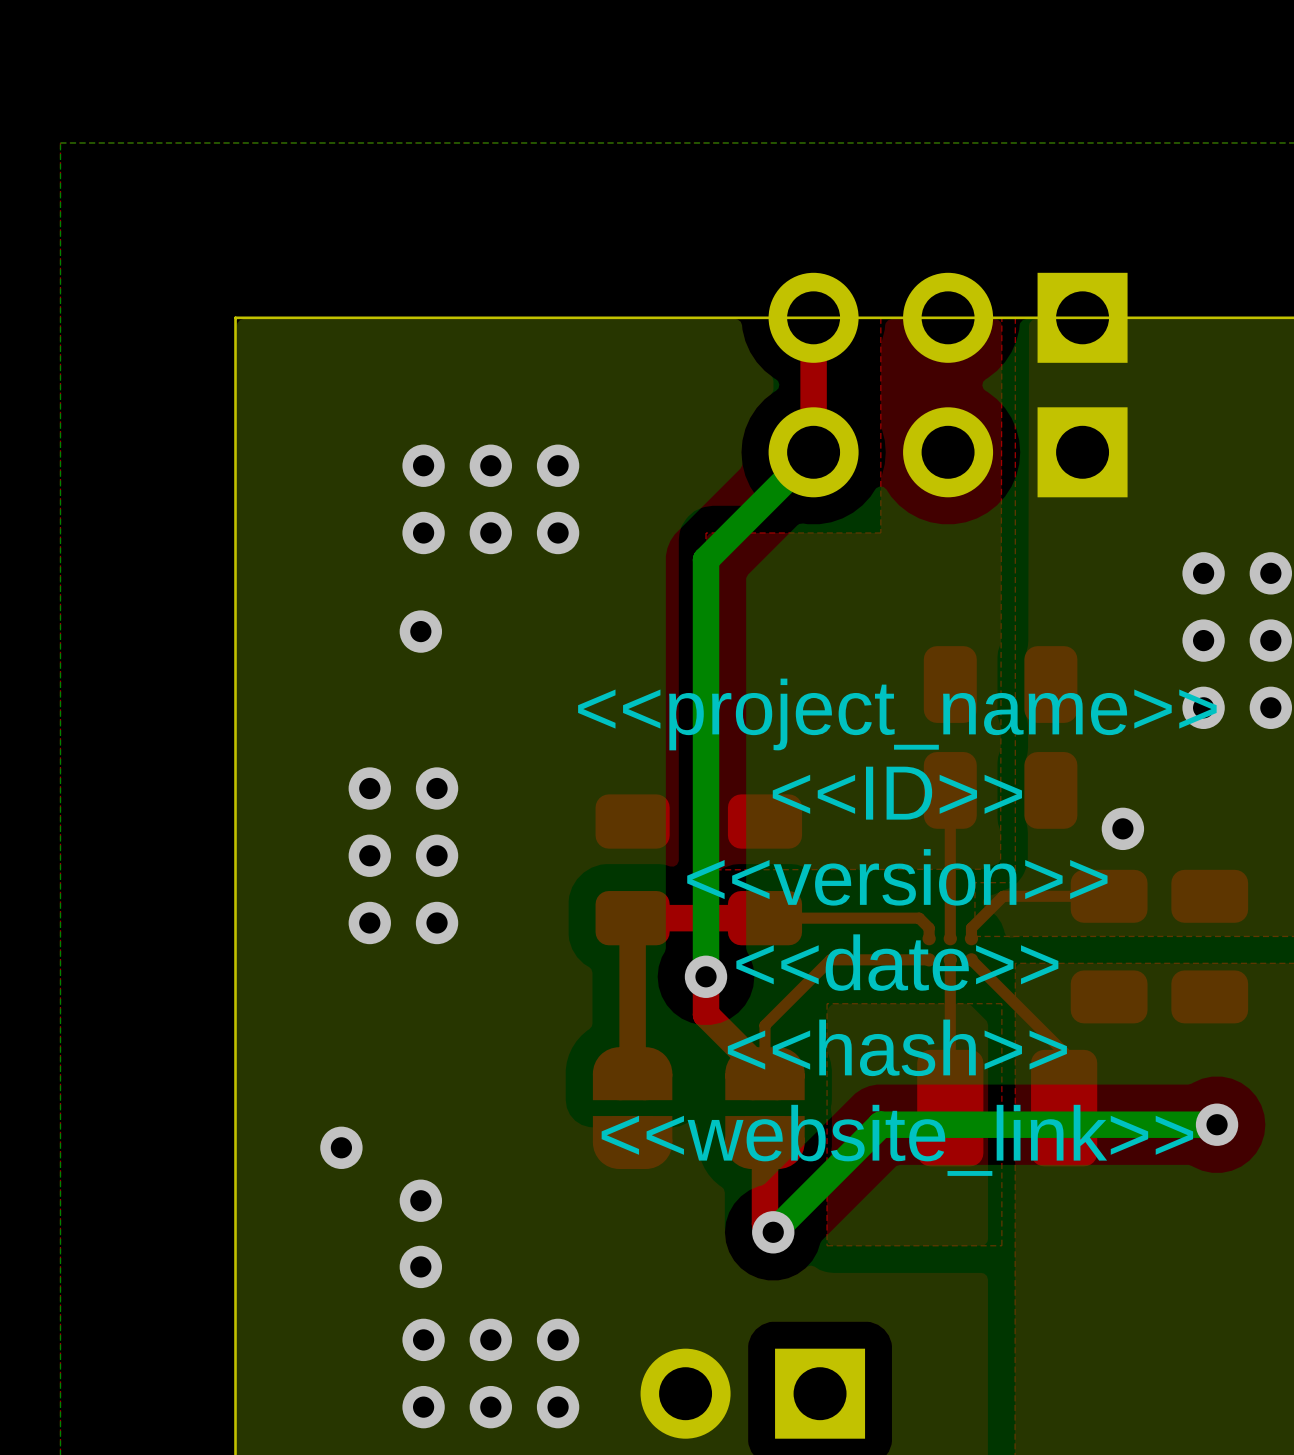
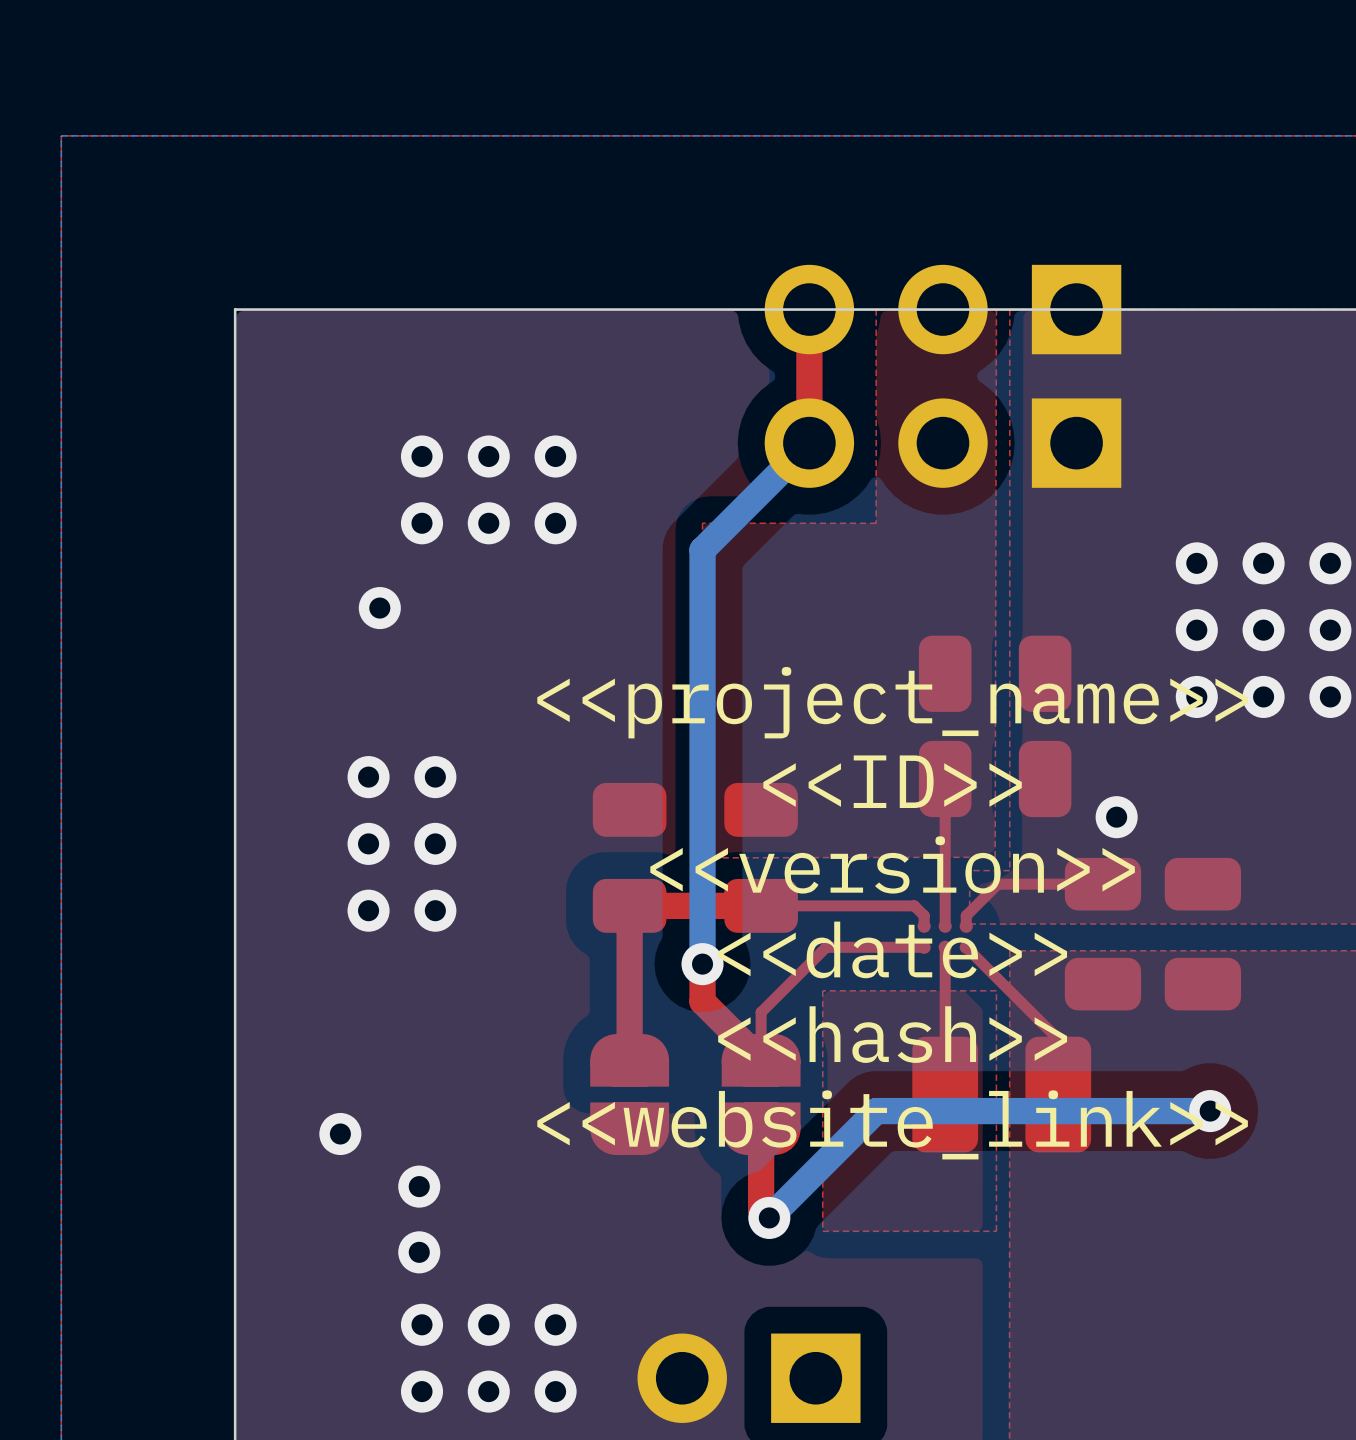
via position: (420, 631) -> (379, 608)

